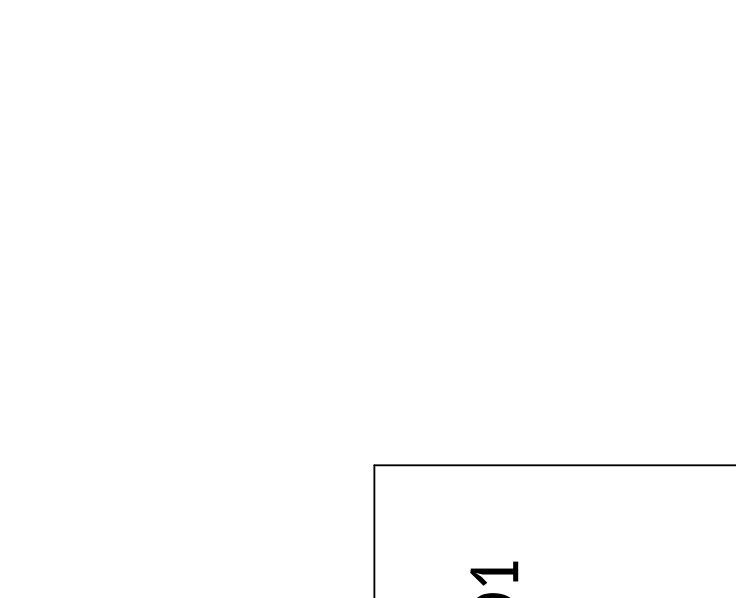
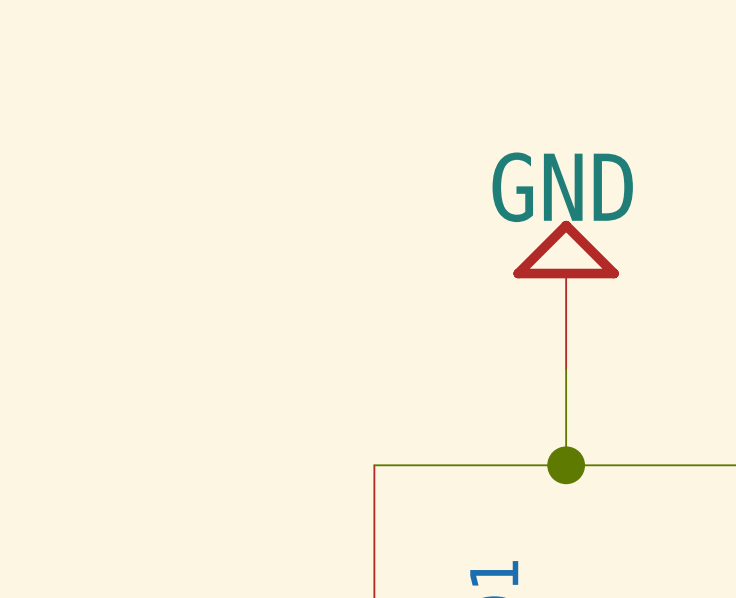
power symbol: none -> GND (566, 295)
wire: none -> (566, 369) (566, 465)
junction: none -> (566, 465)

